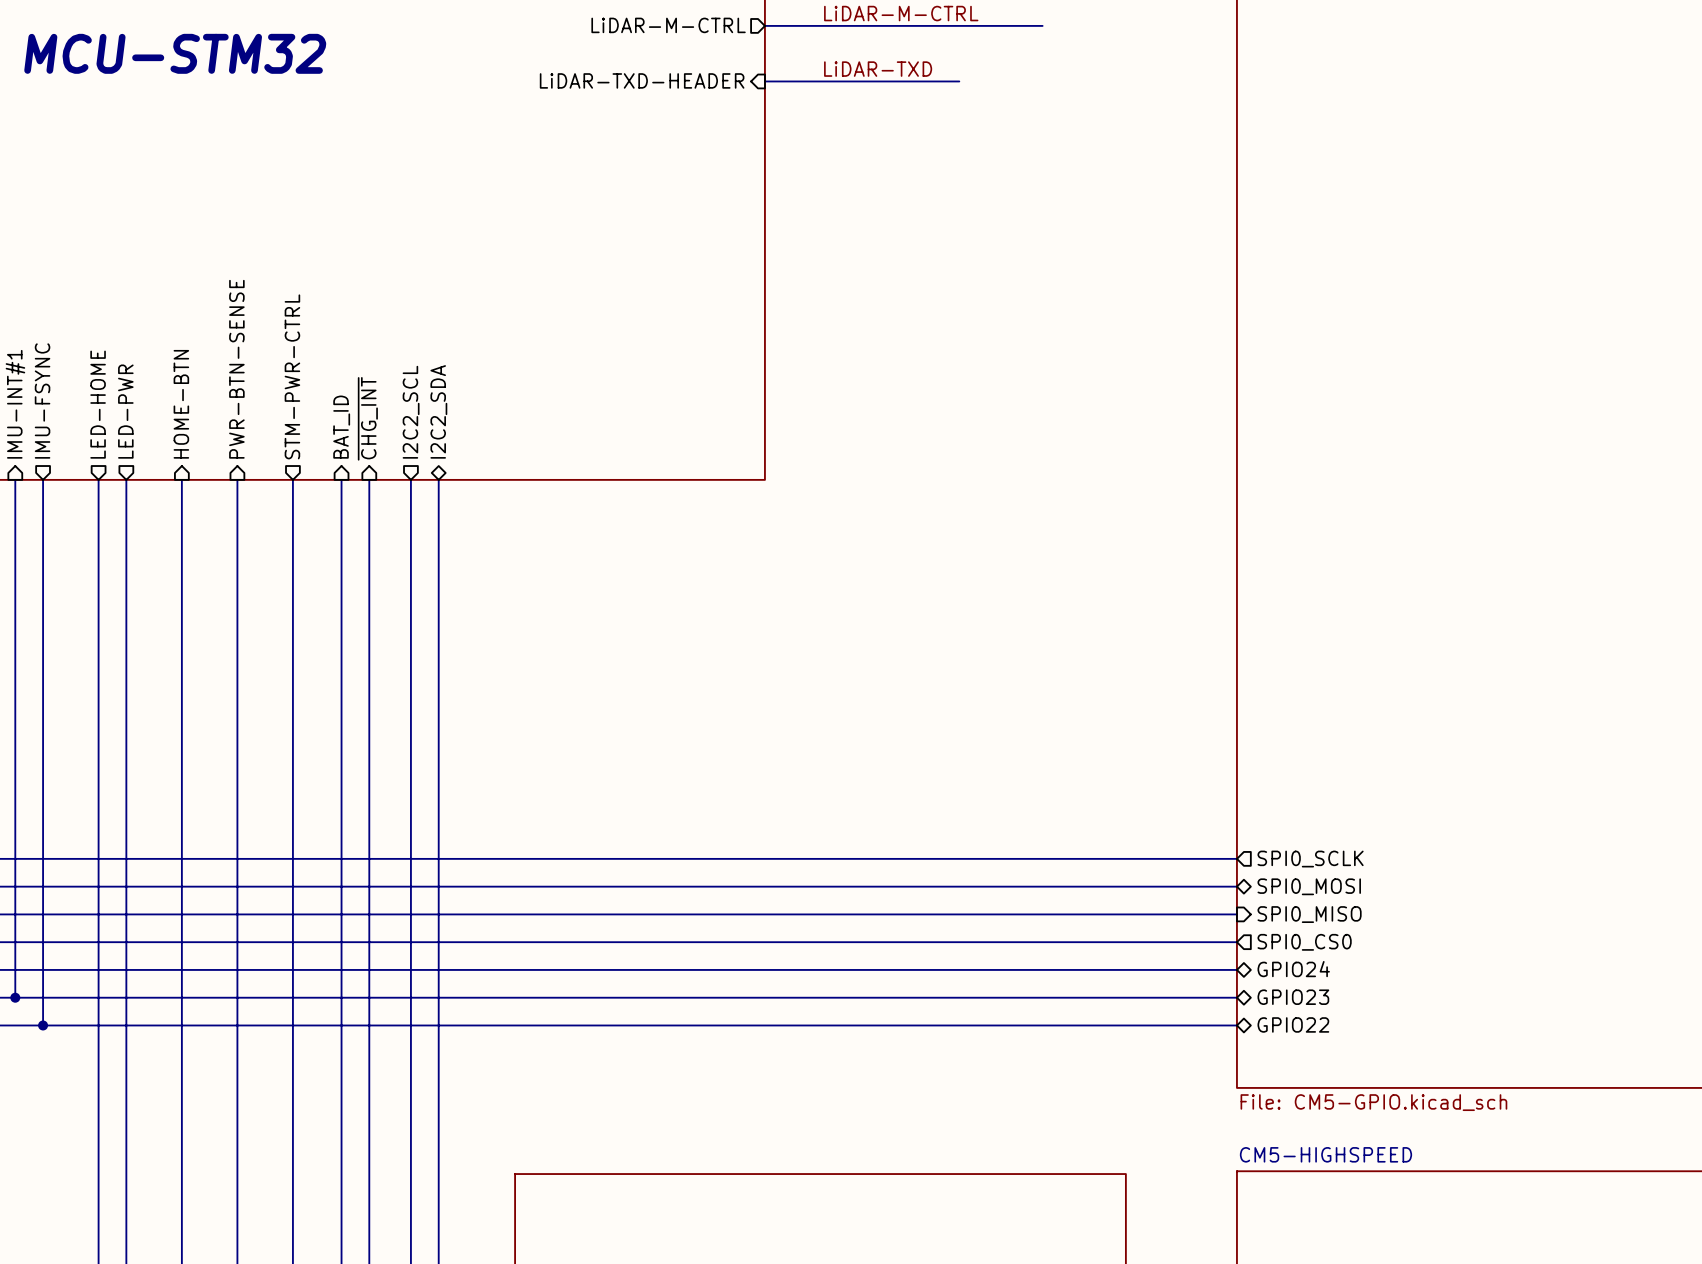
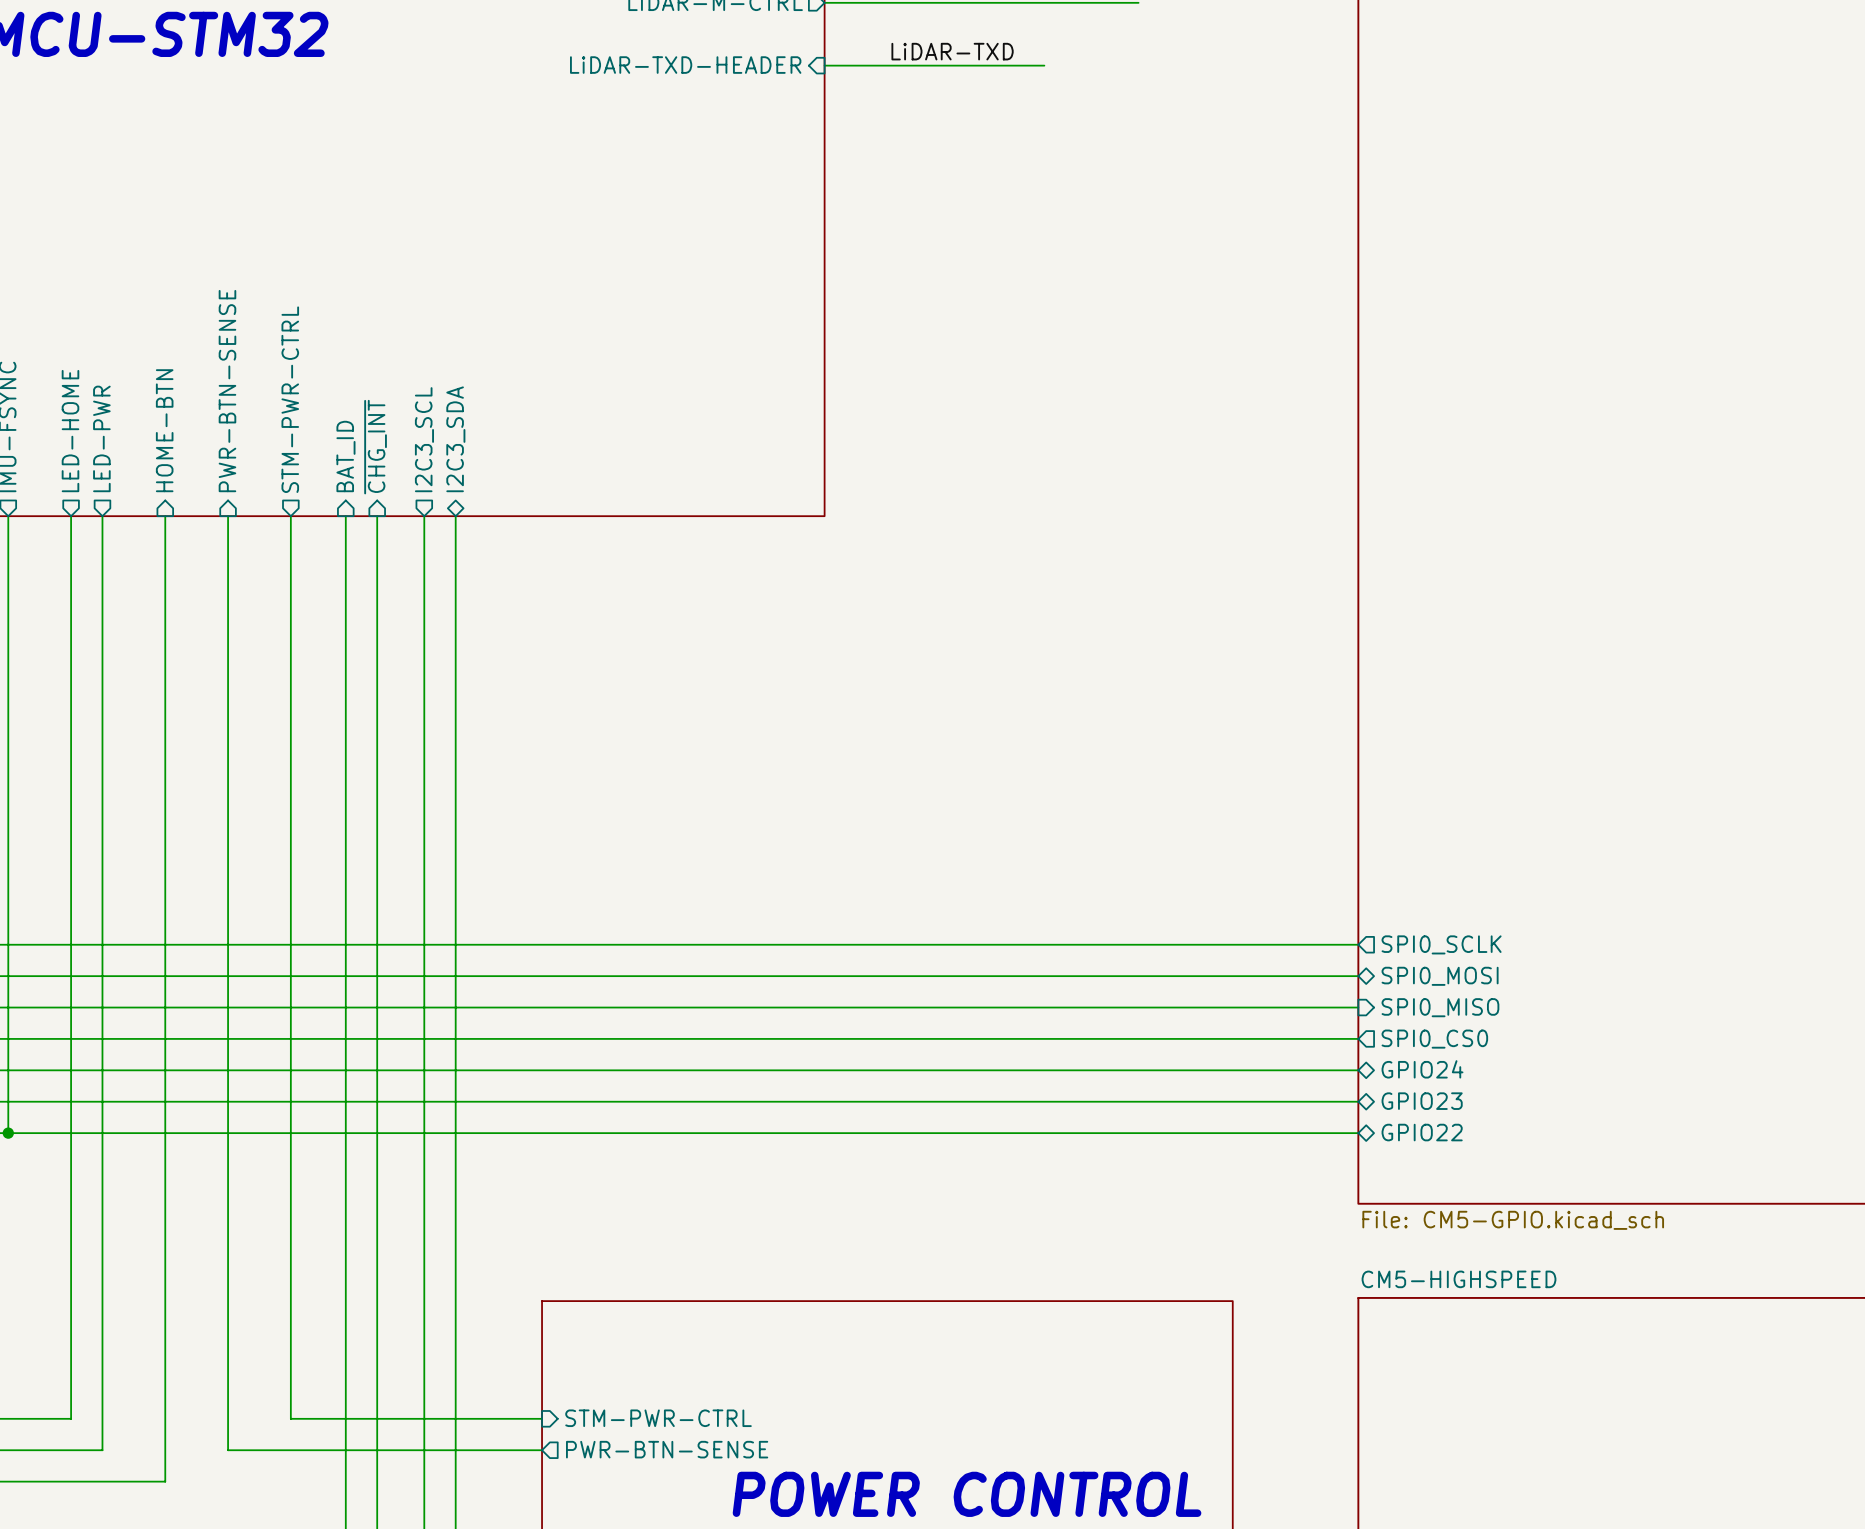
sheet pin: I2C2_SDA (438, 411) -> I2C3_SDA (455, 439)
sheet pin: I2C2_SCL (411, 412) -> I2C3_SCL (424, 439)

